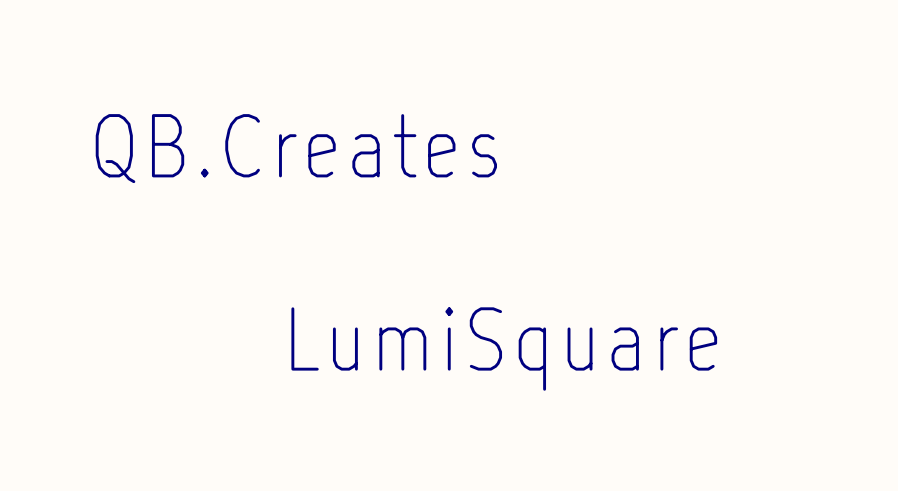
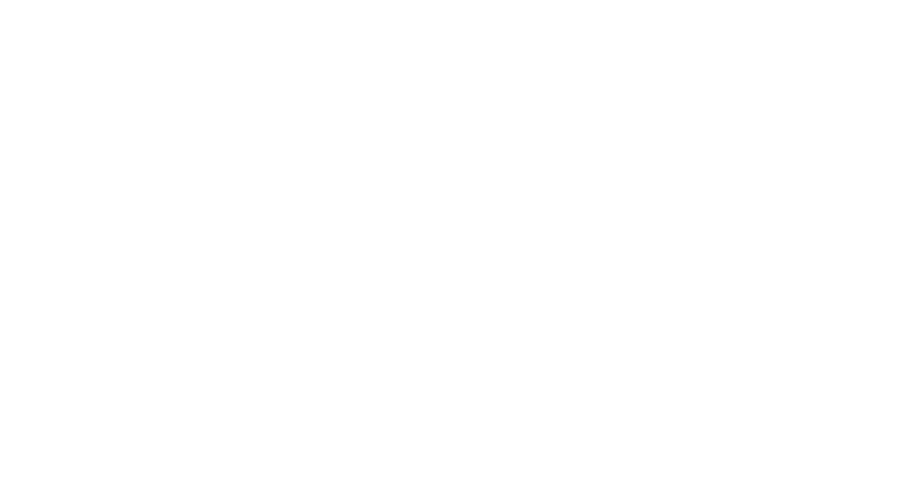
text: QB.Creates (296, 148) -> none
text: LumiSquare (504, 349) -> none

